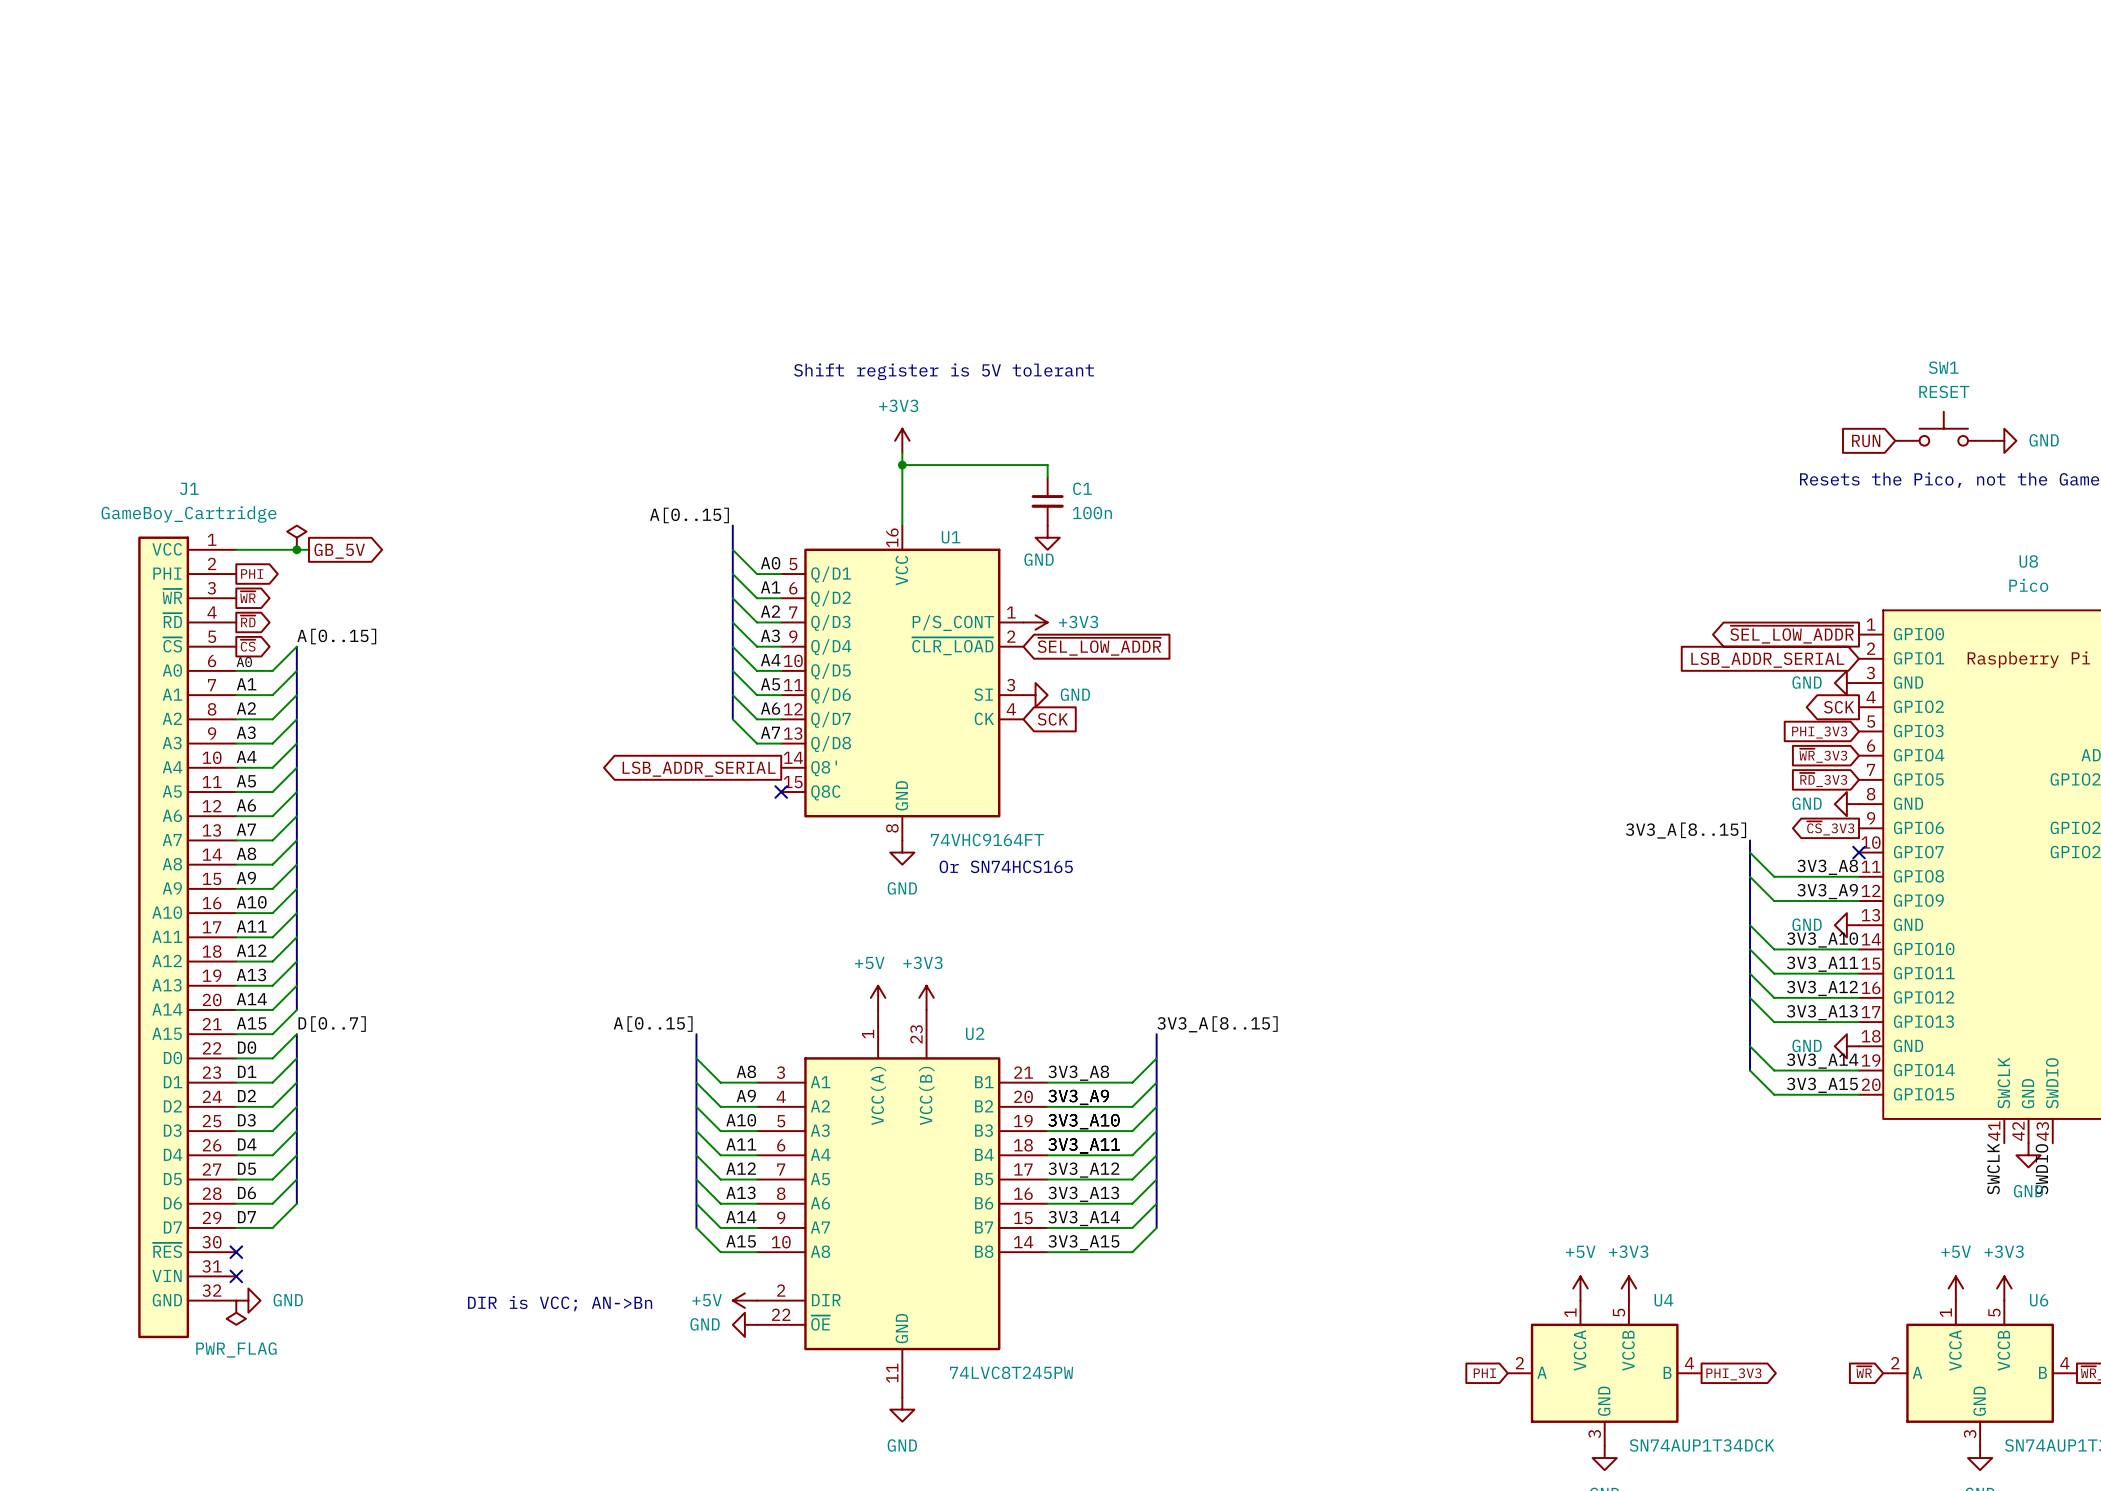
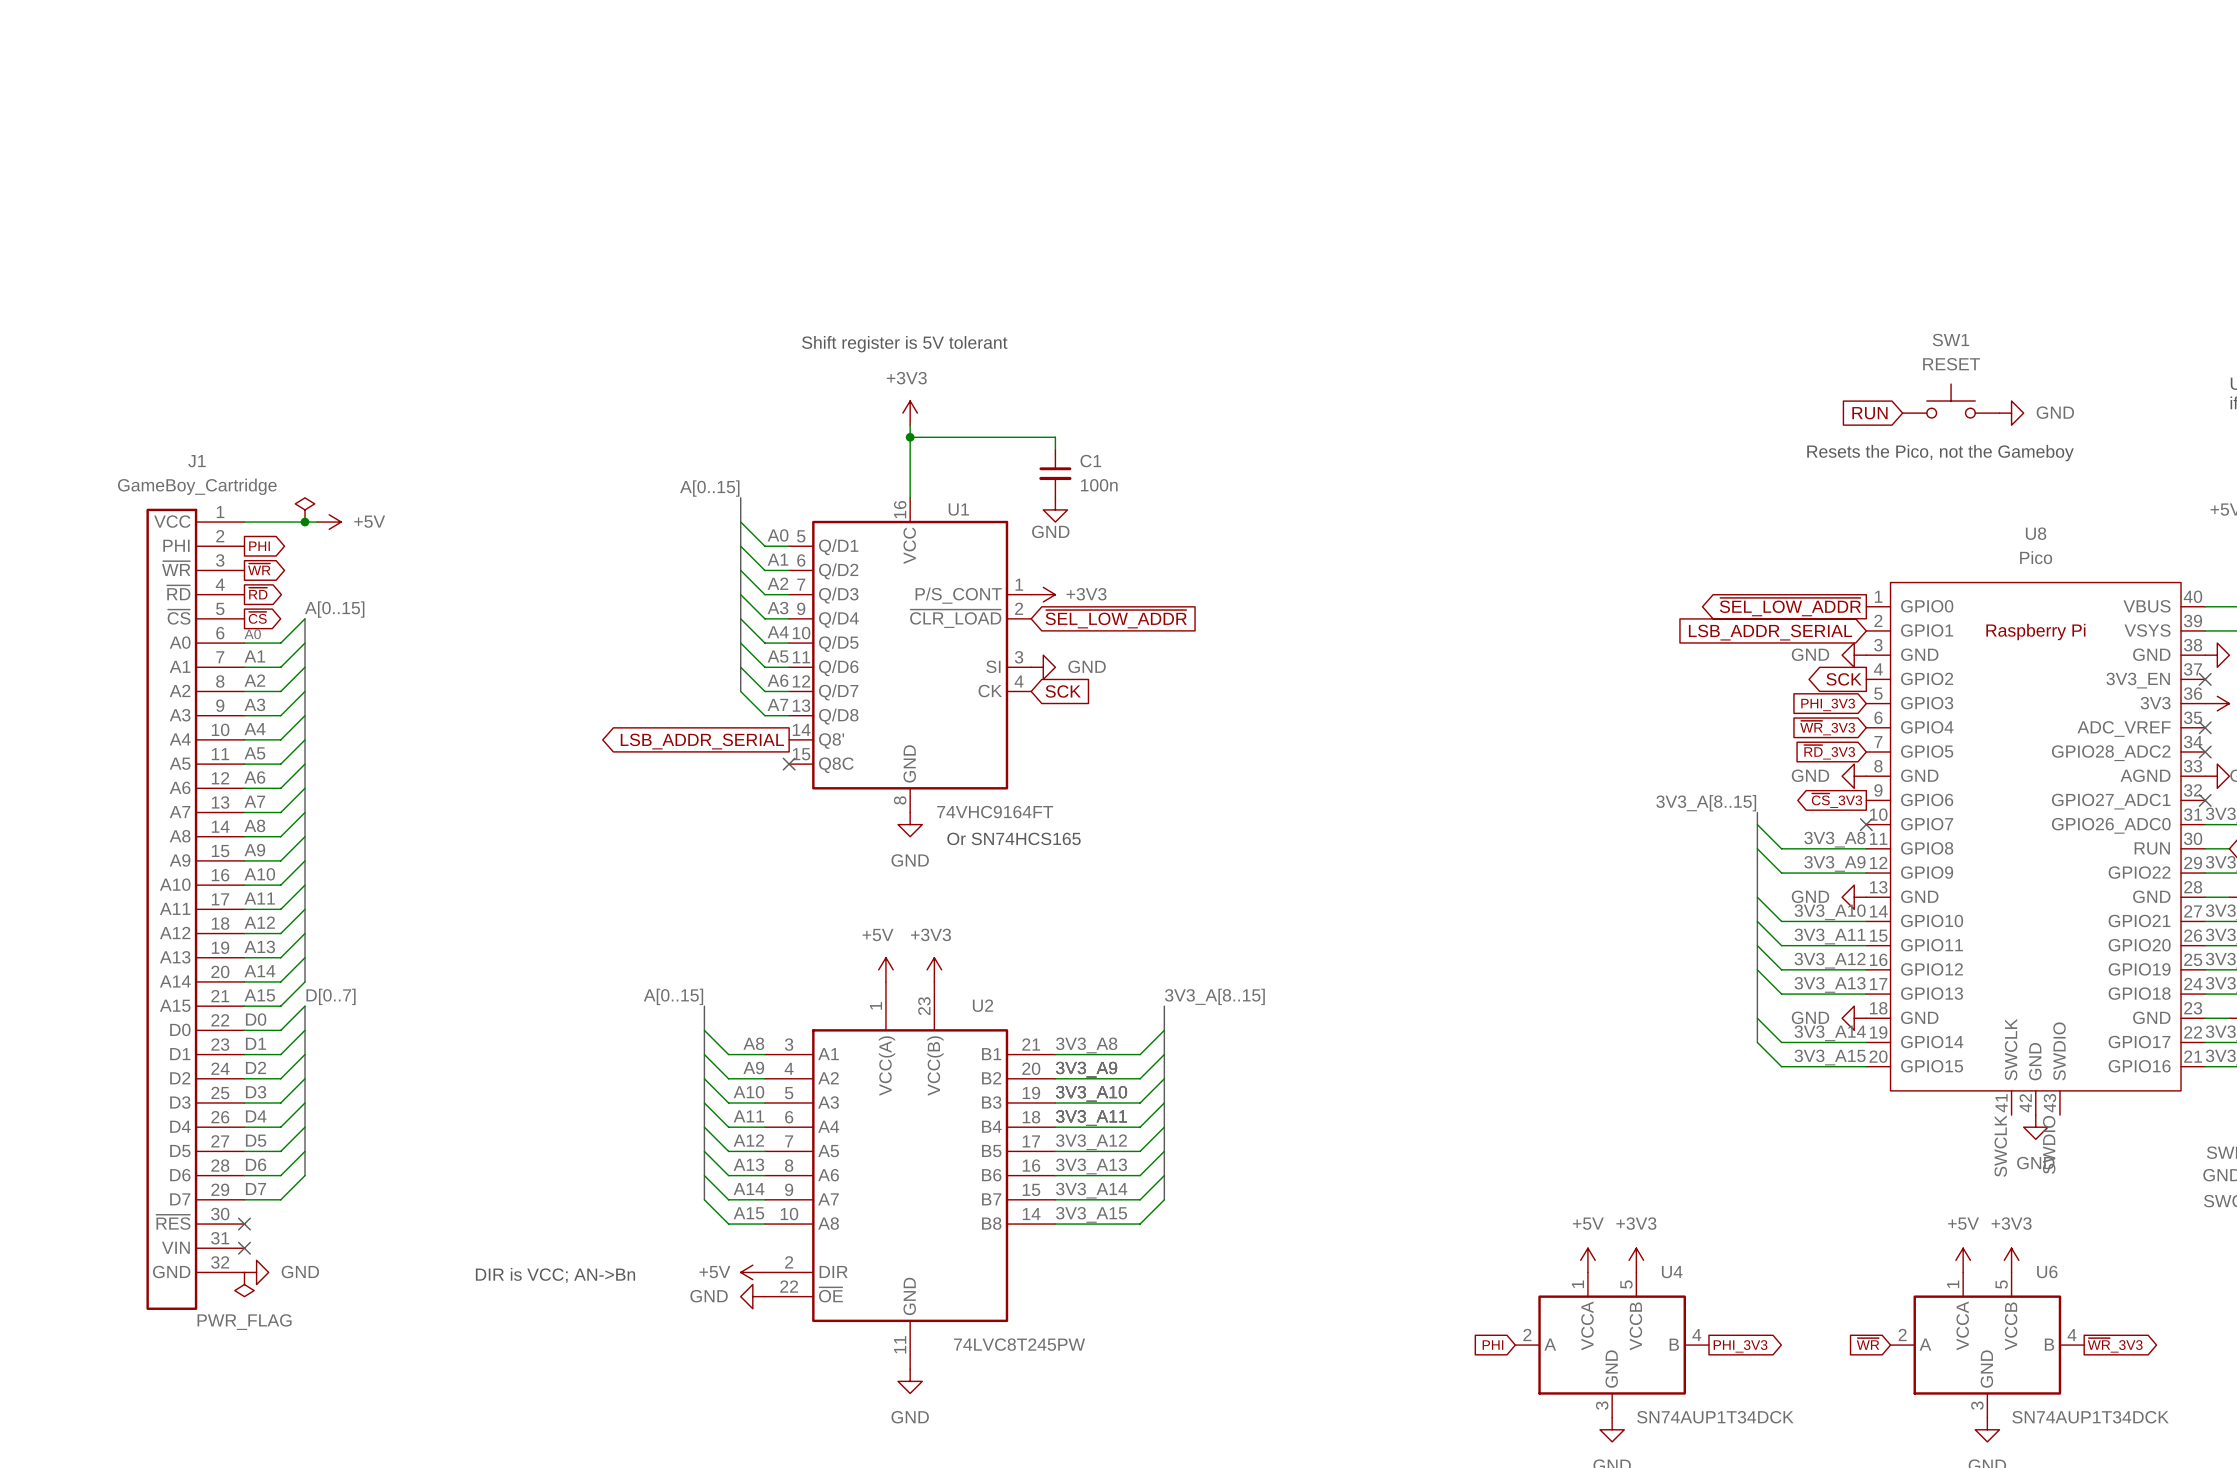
power symbol: none -> +5V (329, 522)
global label: GB_5V (339, 551) -> none

